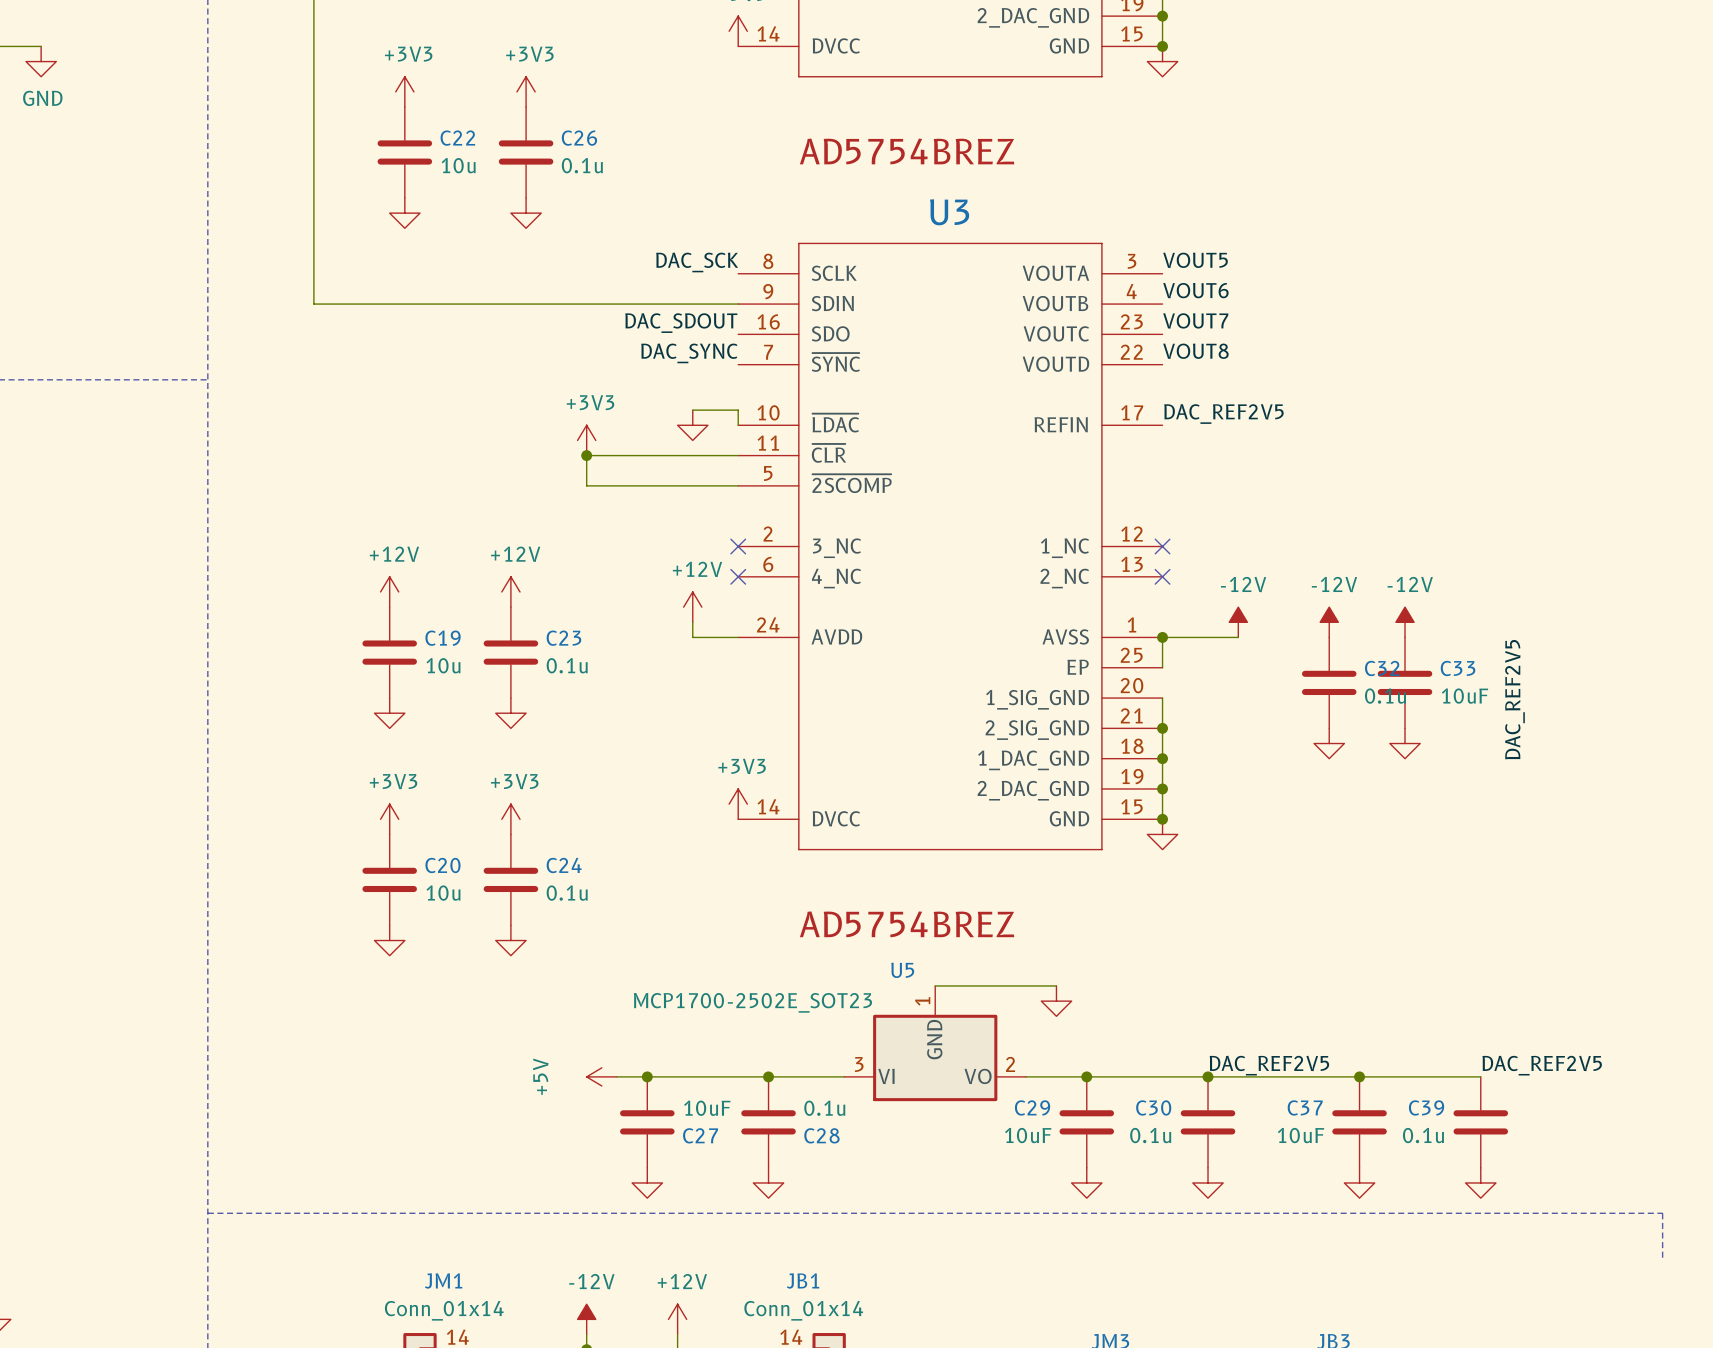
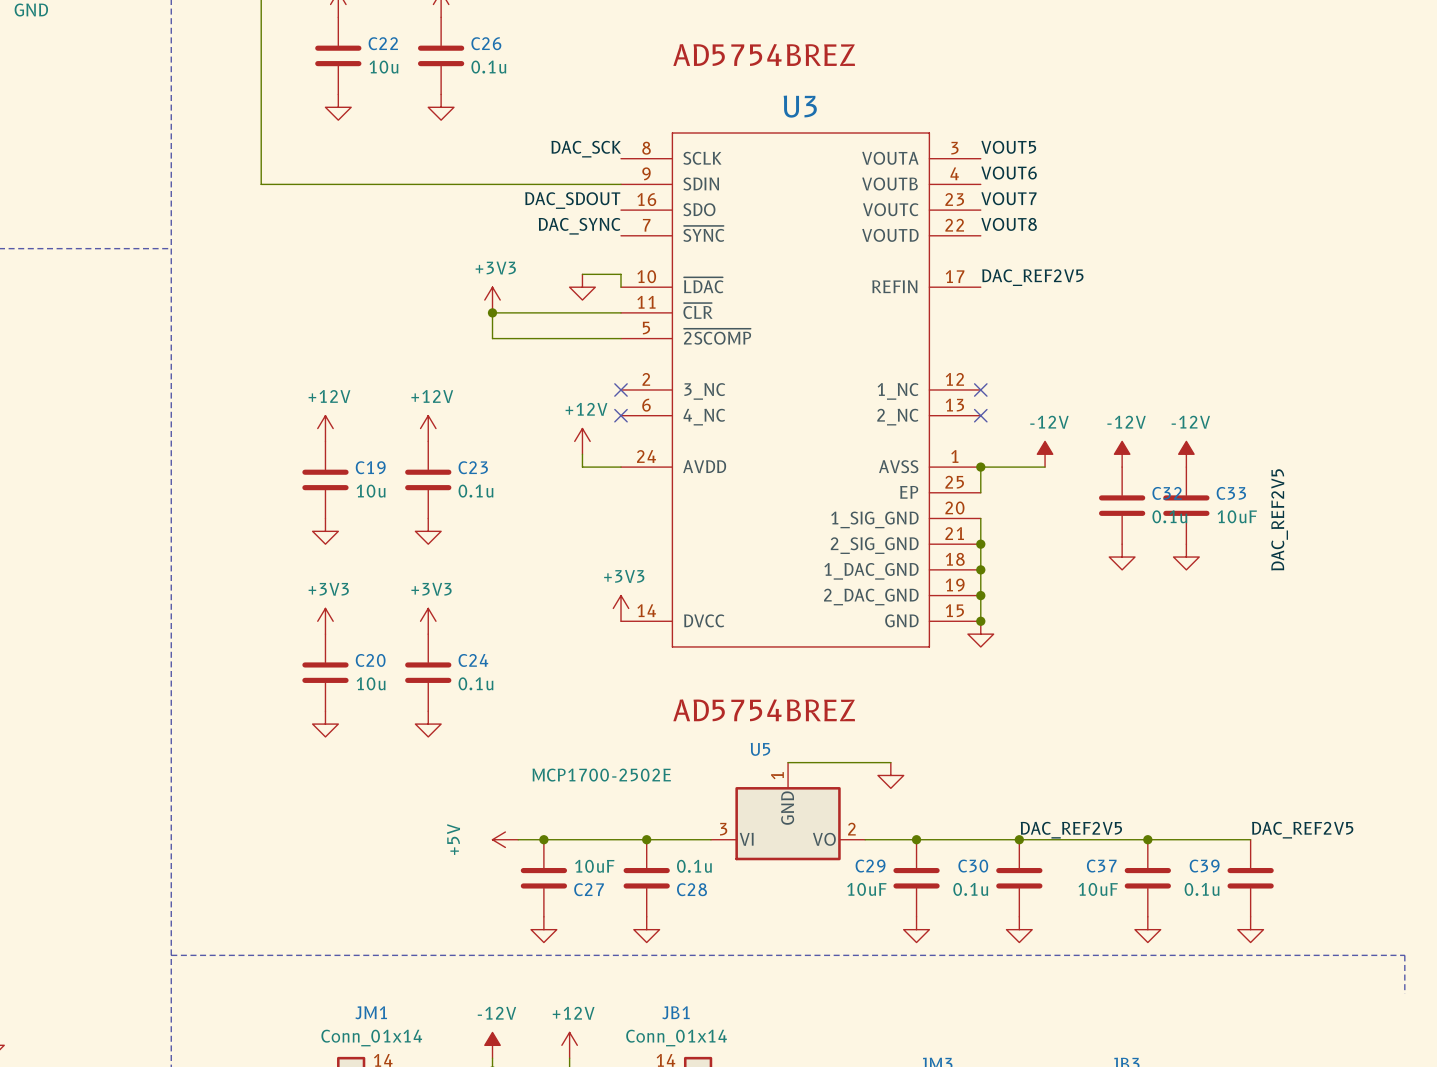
U5 value: MCP1700-2502E_SOT23 (752, 1002) -> MCP1700-2502E (601, 775)

